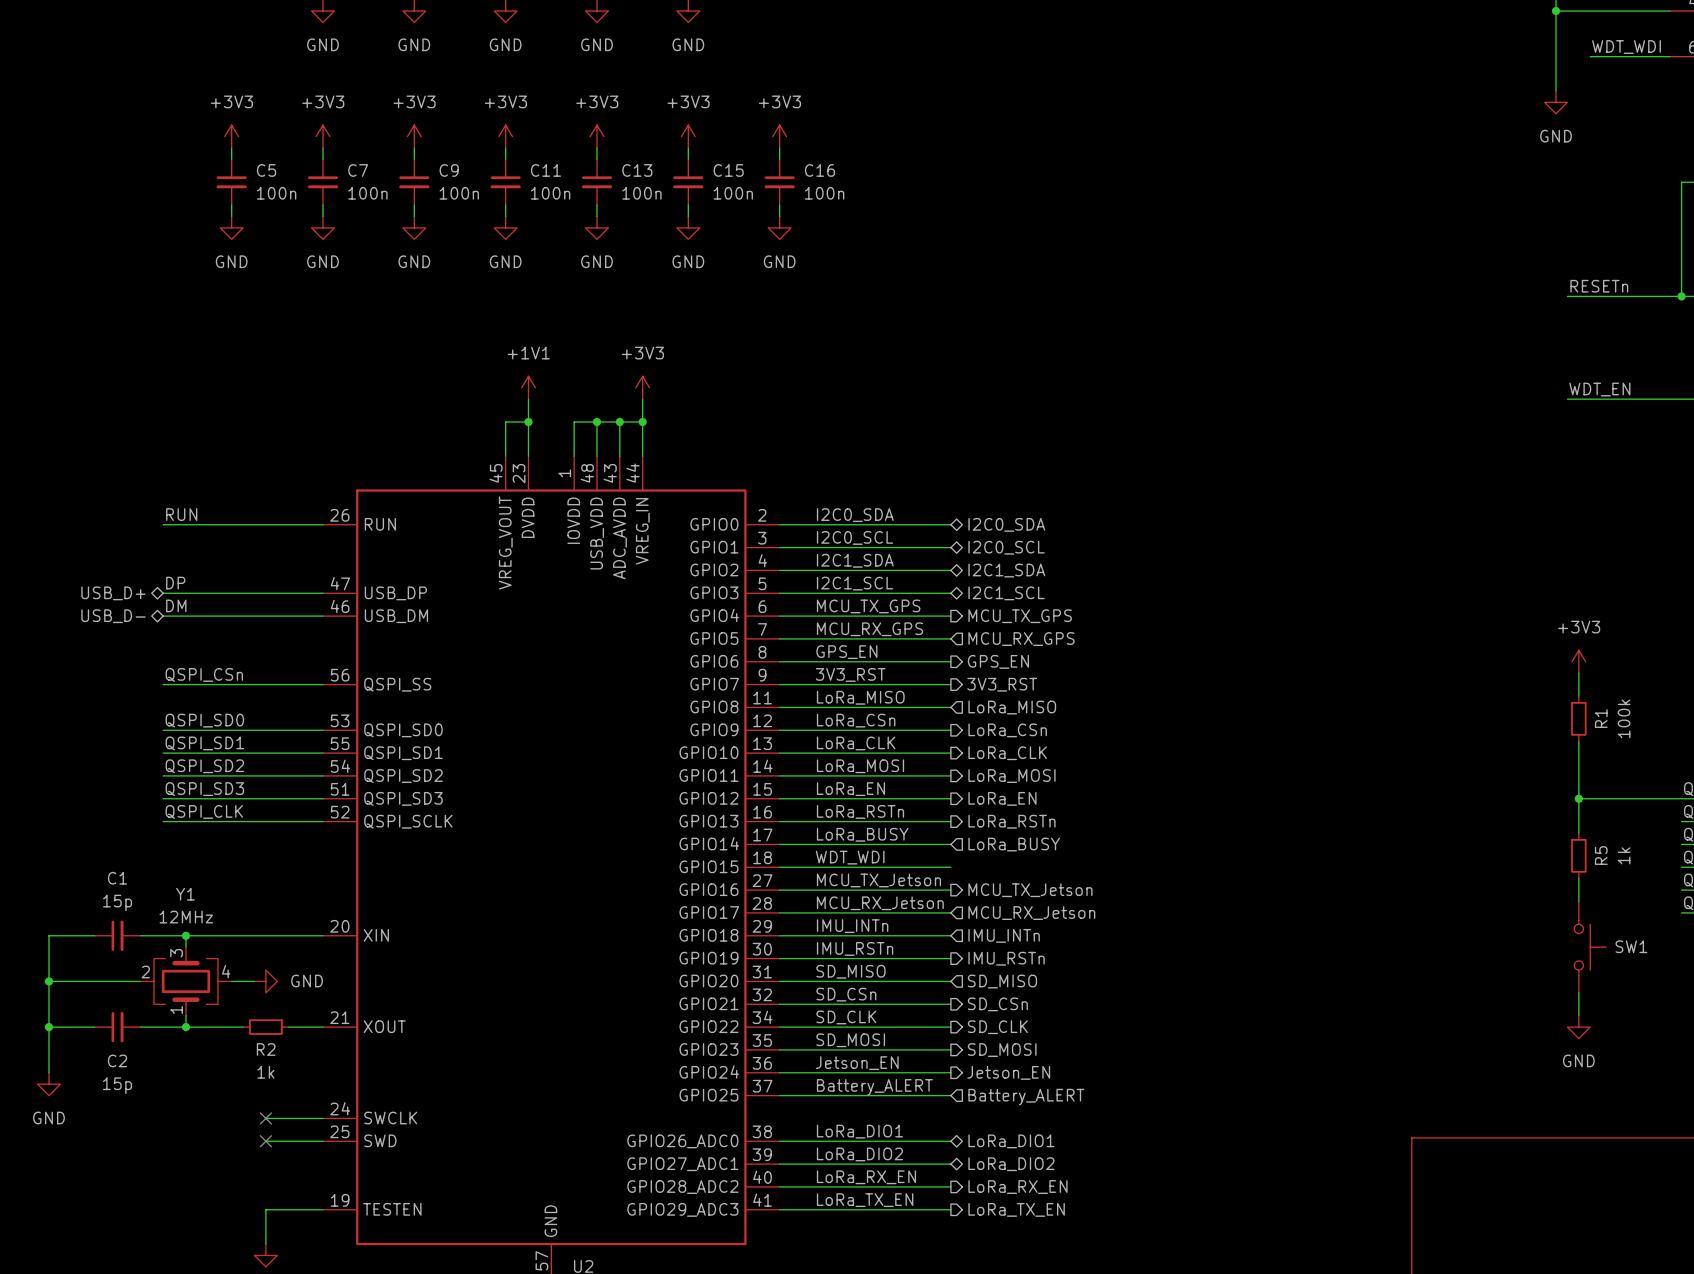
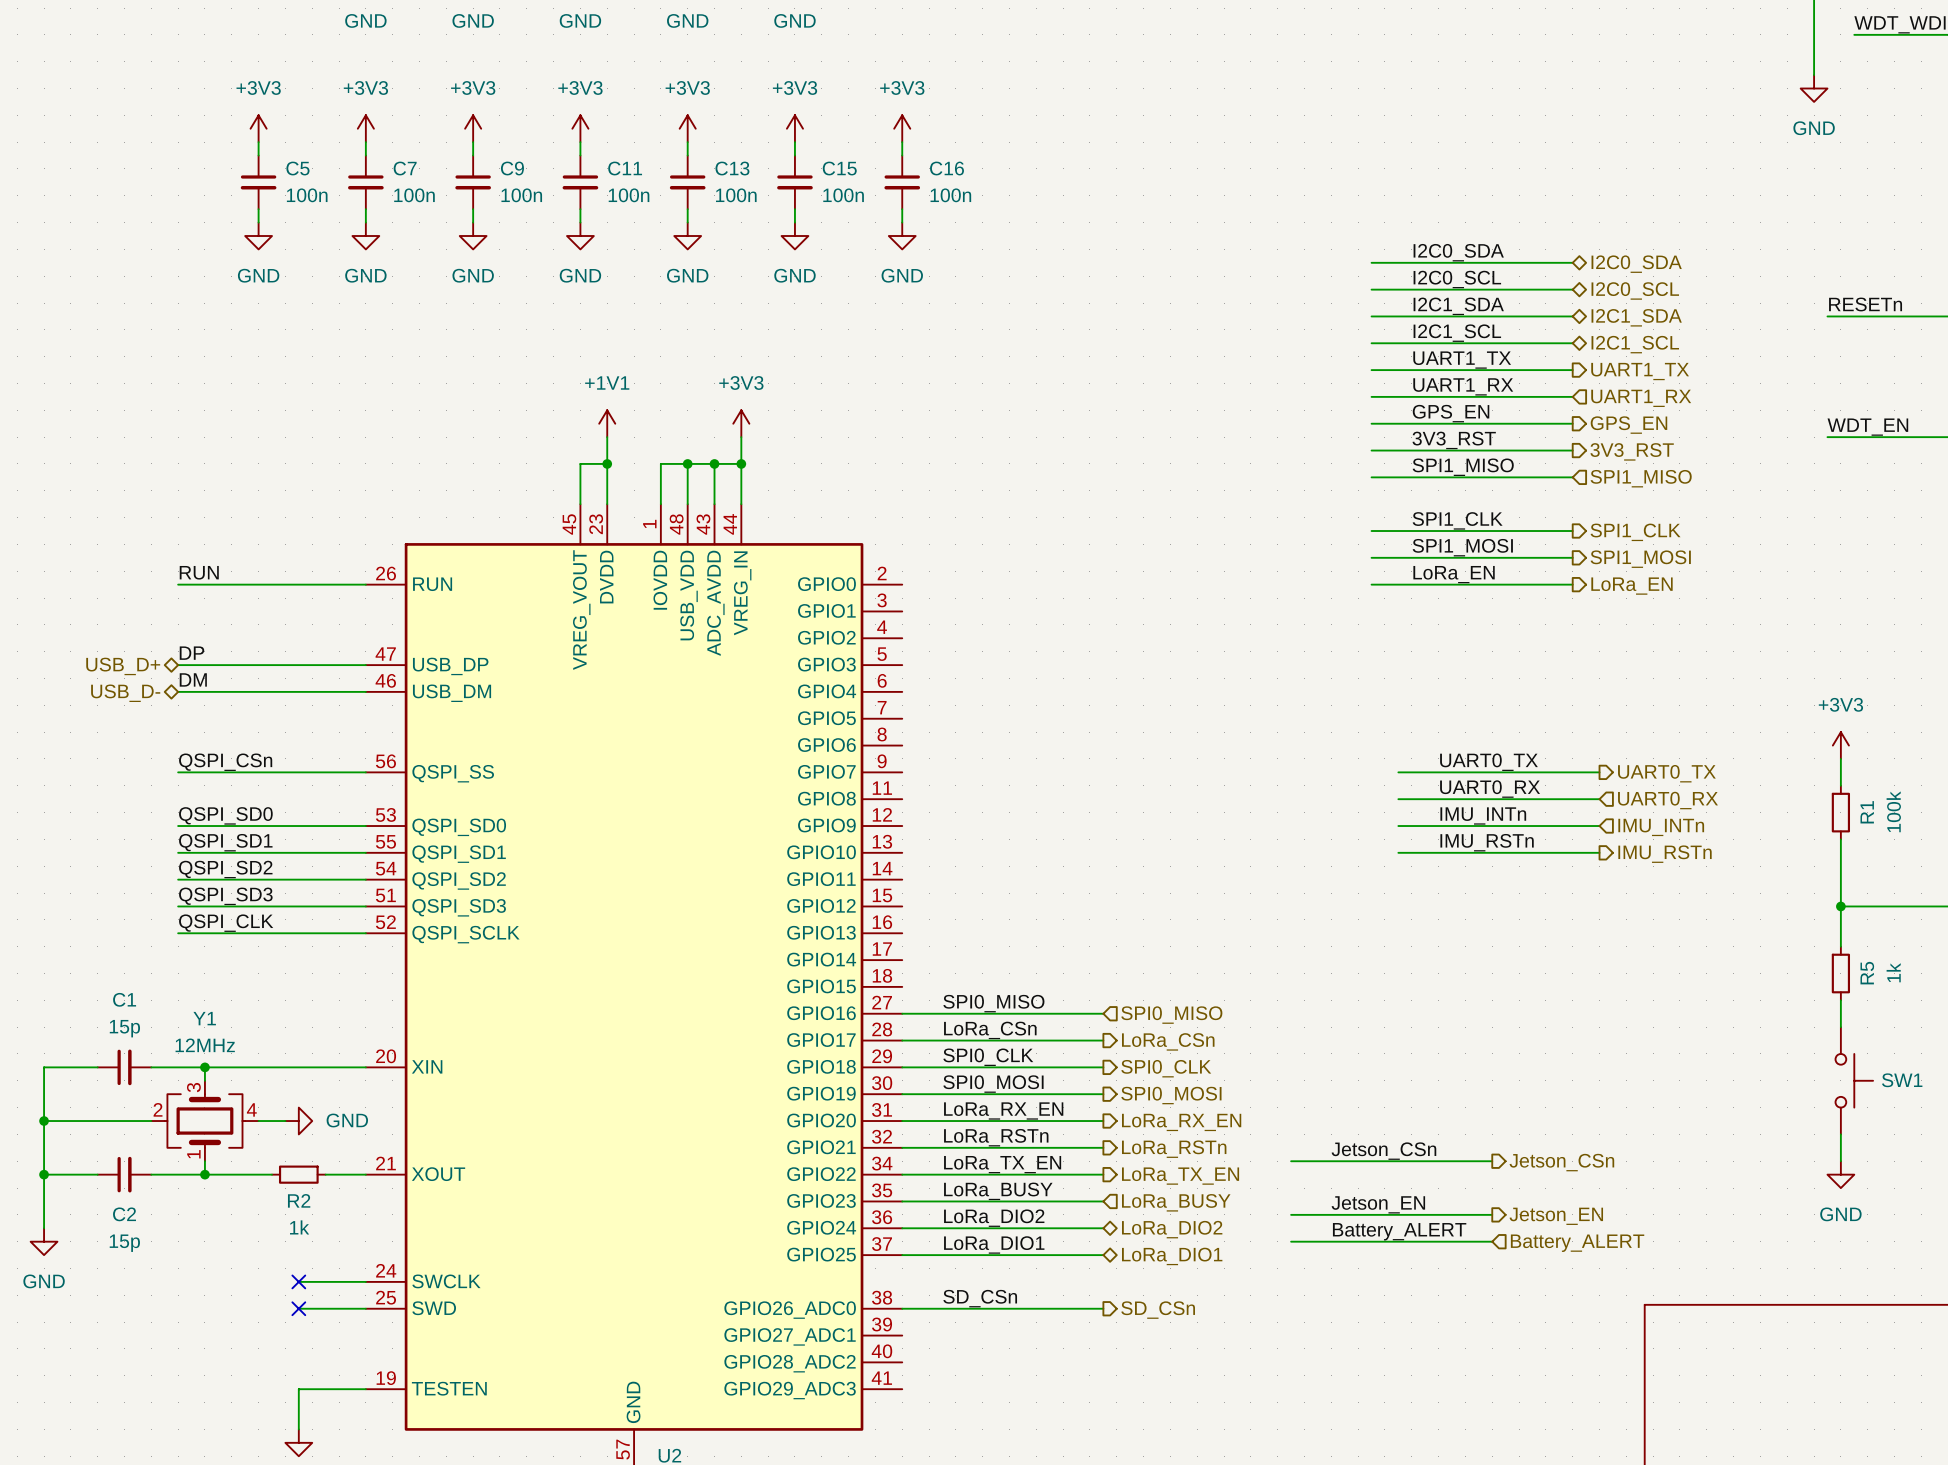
label: none -> I2C0_SDA (1458, 252)
wire: none -> (1371, 262) (1572, 262)
hierarchical label: none -> I2C0_SDA (1636, 264)
label: none -> I2C0_SCL (1457, 279)
wire: none -> (1371, 289) (1572, 289)
hierarchical label: none -> I2C0_SCL (1635, 290)
label: none -> I2C1_SDA (1458, 306)
wire: none -> (1371, 316) (1572, 316)
hierarchical label: none -> I2C1_SDA (1636, 317)
label: none -> I2C1_SCL (1457, 333)
wire: none -> (1371, 343) (1572, 343)
hierarchical label: none -> I2C1_SCL (1635, 344)
label: none -> UART1_TX (1462, 360)
wire: none -> (1371, 370) (1572, 370)
hierarchical label: none -> UART1_TX (1640, 371)
label: none -> UART1_RX (1463, 386)
wire: none -> (1371, 396) (1572, 396)
hierarchical label: none -> UART1_RX (1641, 398)
label: none -> GPS_EN (1451, 413)
wire: none -> (1371, 423) (1572, 423)
hierarchical label: none -> GPS_EN (1628, 425)
label: none -> 3V3_RST (1454, 440)
wire: none -> (1371, 450) (1572, 450)
hierarchical label: none -> 3V3_RST (1632, 451)
label: none -> SPI1_MISO (1463, 467)
wire: none -> (1371, 477) (1572, 477)
hierarchical label: none -> SPI1_MISO (1641, 478)
label: none -> SPI1_CLK (1457, 520)
wire: none -> (1371, 531) (1572, 531)
hierarchical label: none -> SPI1_CLK (1635, 532)
label: none -> SPI1_MOSI (1462, 547)
wire: none -> (1371, 557) (1572, 557)
hierarchical label: none -> SPI1_MOSI (1640, 559)
label: I2C0_SDA (855, 515) -> none
label: none -> LoRa_EN (1454, 574)
wire: (779, 524) (950, 524) -> none
hierarchical label: I2C0_SDA (1006, 524) -> none
wire: none -> (1371, 584) (1572, 584)
hierarchical label: none -> LoRa_EN (1631, 586)
label: I2C0_SCL (855, 537) -> none
wire: (779, 547) (950, 547) -> none
hierarchical label: I2C0_SCL (1006, 547) -> none
label: I2C1_SDA (855, 560) -> none
wire: (779, 570) (950, 570) -> none
hierarchical label: I2C1_SDA (1006, 570) -> none
label: I2C1_SCL (855, 583) -> none
wire: (779, 593) (950, 593) -> none
hierarchical label: I2C1_SCL (1006, 593) -> none
label: MCU_TX_GPS (868, 606) -> none
wire: (779, 616) (950, 616) -> none
hierarchical label: MCU_TX_GPS (1020, 616) -> none
label: MCU_RX_GPS (870, 629) -> none
wire: (779, 638) (950, 638) -> none
hierarchical label: MCU_RX_GPS (1021, 639) -> none
label: GPS_EN (846, 652) -> none
wire: (779, 661) (950, 661) -> none
hierarchical label: GPS_EN (998, 661) -> none
label: 3V3_RST (850, 674) -> none
label: none -> UART0_TX (1488, 762)
wire: (779, 684) (950, 684) -> none
hierarchical label: 3V3_RST (1002, 684) -> none
wire: none -> (1398, 772) (1599, 772)
hierarchical label: none -> UART0_TX (1666, 773)
label: LoRa_MISO (860, 697) -> none
label: none -> UART0_RX (1490, 789)
wire: (779, 707) (950, 707) -> none
hierarchical label: LoRa_MISO (1012, 707) -> none
wire: none -> (1398, 799) (1599, 799)
hierarchical label: none -> UART0_RX (1668, 800)
label: LoRa_CSn (856, 720) -> none
label: none -> IMU_INTn (1483, 815)
wire: (779, 730) (950, 730) -> none
hierarchical label: LoRa_CSn (1007, 730) -> none
wire: none -> (1398, 826) (1599, 826)
hierarchical label: none -> IMU_INTn (1661, 827)
label: LoRa_CLK (856, 743) -> none
label: none -> IMU_RSTn (1487, 842)
wire: (779, 753) (950, 753) -> none
hierarchical label: LoRa_CLK (1007, 753) -> none
wire: none -> (1398, 852) (1599, 852)
hierarchical label: none -> IMU_RSTn (1665, 854)
label: LoRa_MOSI (860, 766) -> none
wire: (779, 775) (950, 775) -> none
hierarchical label: LoRa_MOSI (1011, 776) -> none
label: LoRa_EN (850, 789) -> none
wire: (779, 798) (950, 798) -> none
hierarchical label: LoRa_EN (1002, 798) -> none
label: LoRa_RSTn (860, 811) -> none
wire: (779, 821) (950, 821) -> none
hierarchical label: LoRa_RSTn (1011, 821) -> none
label: LoRa_BUSY (862, 834) -> none
wire: (779, 844) (950, 844) -> none
hierarchical label: LoRa_BUSY (1014, 844) -> none
label: WDT_WDI (850, 857) -> none
wire: (779, 867) (950, 867) -> none
label: MCU_TX_Jetson (878, 880) -> SPI0_MISO (993, 1003)
hierarchical label shape: output (1030, 890) -> input (1171, 1015)
hierarchical label: MCU_TX_Jetson (1030, 890) -> SPI0_MISO (1171, 1015)
label: MCU_RX_Jetson (880, 903) -> LoRa_CSn (990, 1030)
hierarchical label shape: input (1031, 913) -> output (1168, 1041)
hierarchical label: MCU_RX_Jetson (1031, 913) -> LoRa_CSn (1168, 1041)
label: IMU_INTn (852, 926) -> SPI0_CLK (988, 1057)
hierarchical label shape: input (1004, 935) -> output (1166, 1068)
hierarchical label: IMU_INTn (1004, 935) -> SPI0_CLK (1166, 1068)
label: IMU_RSTn (855, 948) -> SPI0_MOSI (993, 1084)
hierarchical label: IMU_RSTn (1006, 958) -> SPI0_MOSI (1171, 1095)
label: SD_MISO (850, 971) -> LoRa_RX_EN (1003, 1110)
hierarchical label shape: input (1002, 981) -> output (1181, 1122)
hierarchical label: SD_MISO (1002, 981) -> LoRa_RX_EN (1181, 1122)
label: SD_CSn (846, 994) -> LoRa_RSTn (996, 1137)
hierarchical label: SD_CSn (997, 1004) -> LoRa_RSTn (1174, 1149)
label: none -> Jetson_CSn (1383, 1151)
wire: none -> (1291, 1161) (1492, 1161)
hierarchical label: none -> Jetson_CSn (1561, 1162)
label: SD_CLK (846, 1017) -> LoRa_TX_EN (1002, 1164)
hierarchical label: SD_CLK (997, 1027) -> LoRa_TX_EN (1180, 1176)
label: SD_MOSI (850, 1040) -> LoRa_BUSY (998, 1191)
hierarchical label shape: output (1002, 1050) -> input (1176, 1202)
hierarchical label: SD_MOSI (1002, 1050) -> LoRa_BUSY (1176, 1202)
label: none -> Jetson_EN (1378, 1204)
wire: none -> (1291, 1214) (1492, 1214)
hierarchical label: none -> Jetson_EN (1556, 1216)
label: Jetson_EN (857, 1063) -> LoRa_DIO2 (994, 1218)
hierarchical label shape: output (1008, 1072) -> bidirectional (1172, 1229)
hierarchical label: Jetson_EN (1008, 1072) -> LoRa_DIO2 (1172, 1229)
label: none -> Battery_ALERT (1399, 1231)
wire: none -> (1291, 1241) (1492, 1241)
hierarchical label: none -> Battery_ALERT (1577, 1243)
label: Battery_ALERT (874, 1087) -> LoRa_DIO1 (994, 1244)
hierarchical label shape: input (1026, 1097) -> bidirectional (1172, 1256)
hierarchical label: Battery_ALERT (1026, 1097) -> LoRa_DIO1 (1172, 1256)
label: LoRa_DIO1 (859, 1131) -> SD_CSn (980, 1298)
hierarchical label shape: bidirectional (1011, 1141) -> output (1158, 1310)
hierarchical label: LoRa_DIO1 (1011, 1141) -> SD_CSn (1158, 1310)
label: LoRa_DIO2 (859, 1154) -> none
wire: (779, 1164) (950, 1164) -> none
hierarchical label: LoRa_DIO2 (1011, 1164) -> none
label: LoRa_RX_EN (866, 1177) -> none
wire: (779, 1186) (950, 1186) -> none
hierarchical label: LoRa_RX_EN (1017, 1187) -> none
label: LoRa_TX_EN (865, 1200) -> none
wire: (779, 1209) (950, 1209) -> none
hierarchical label: LoRa_TX_EN (1016, 1209) -> none

